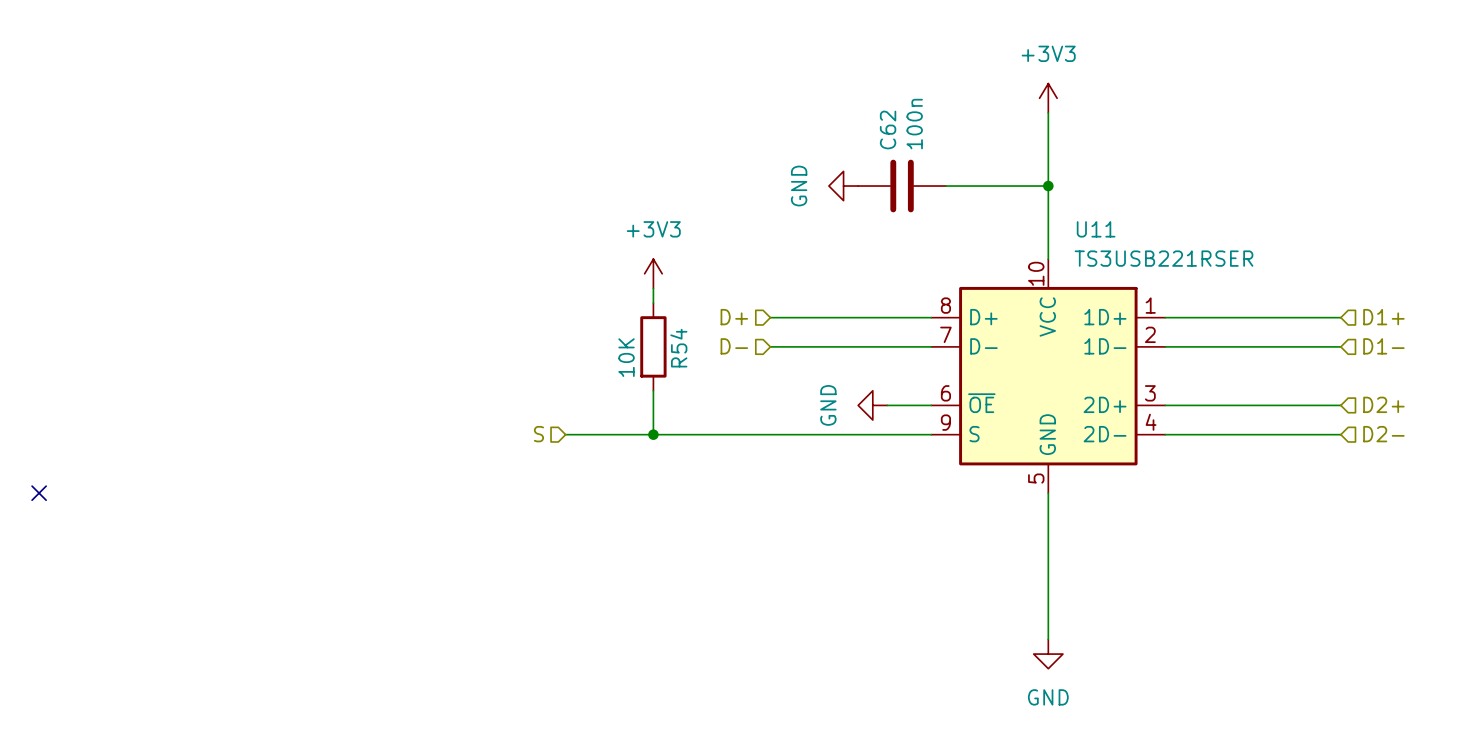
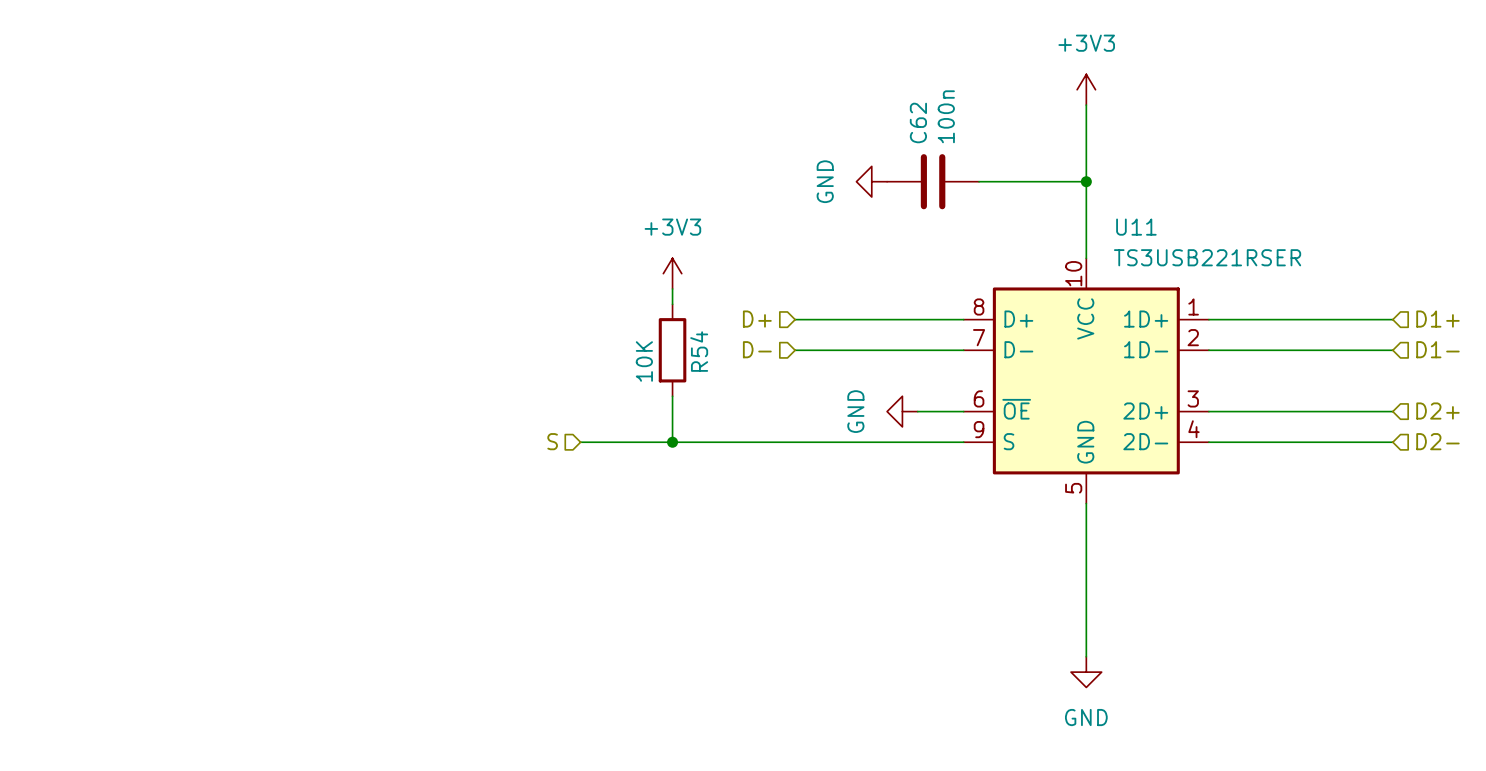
no-connect mark: (39, 493) -> none

